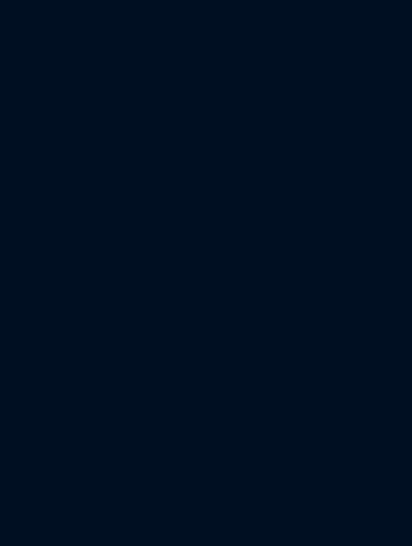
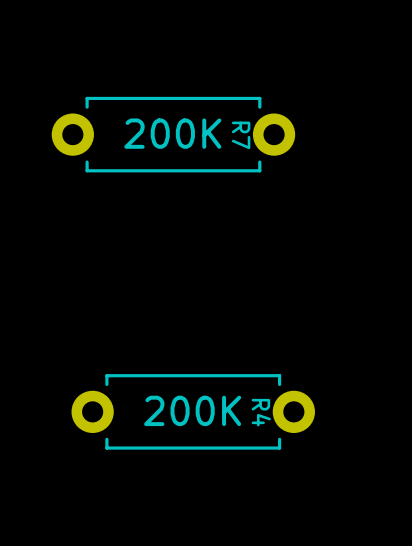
R7: none -> 200K (173, 134)
R4: none -> 200K (193, 411)

